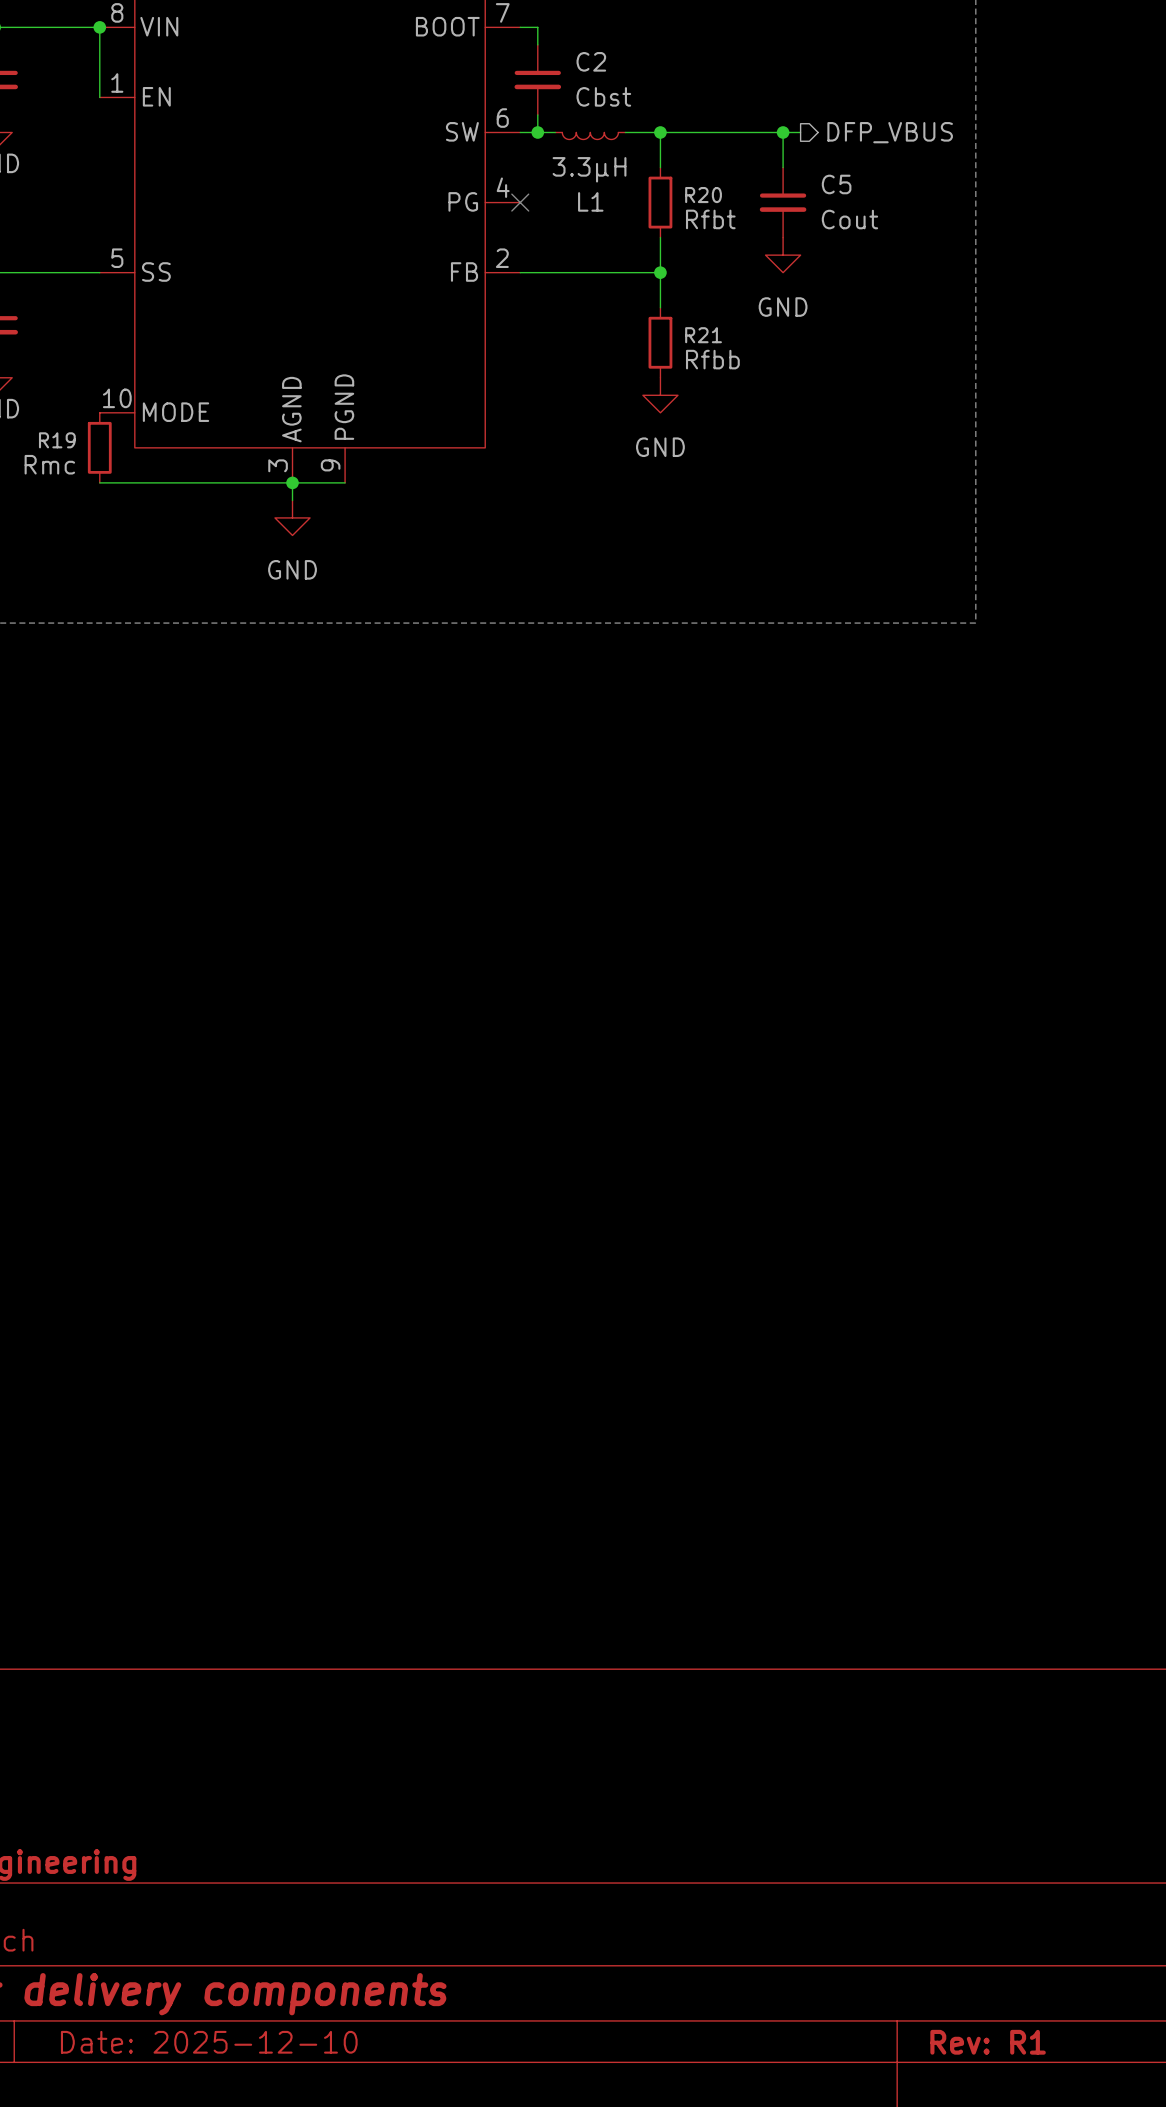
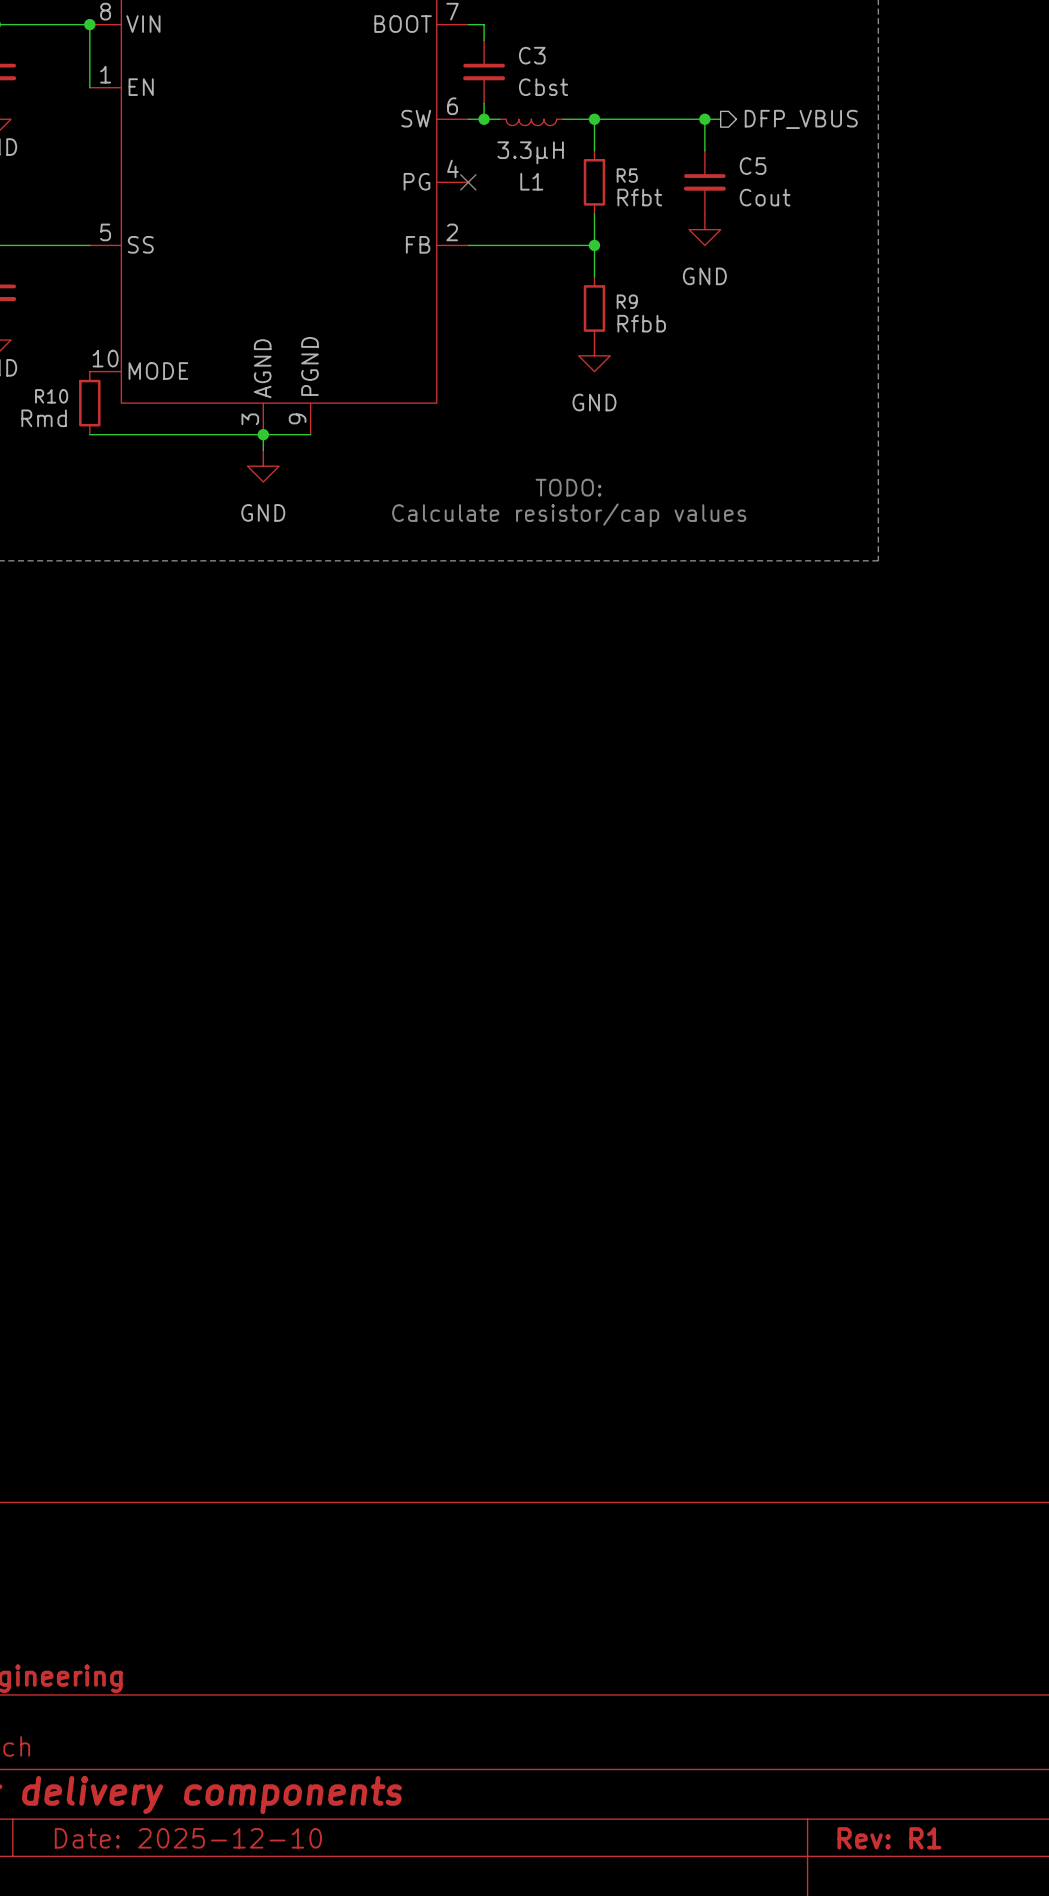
C2 name: C2 (591, 61) -> C3 (532, 55)
R20 name: R20 (703, 195) -> R5 (627, 175)
R21 name: R21 (703, 335) -> R9 (627, 301)
R19 name: R19 (57, 440) -> R10 (51, 396)
R19 value: Rmc (49, 464) -> Rmd (44, 418)
text: none -> TODO: (568, 487)
text: none -> Calculate resistor/cap values (569, 515)

